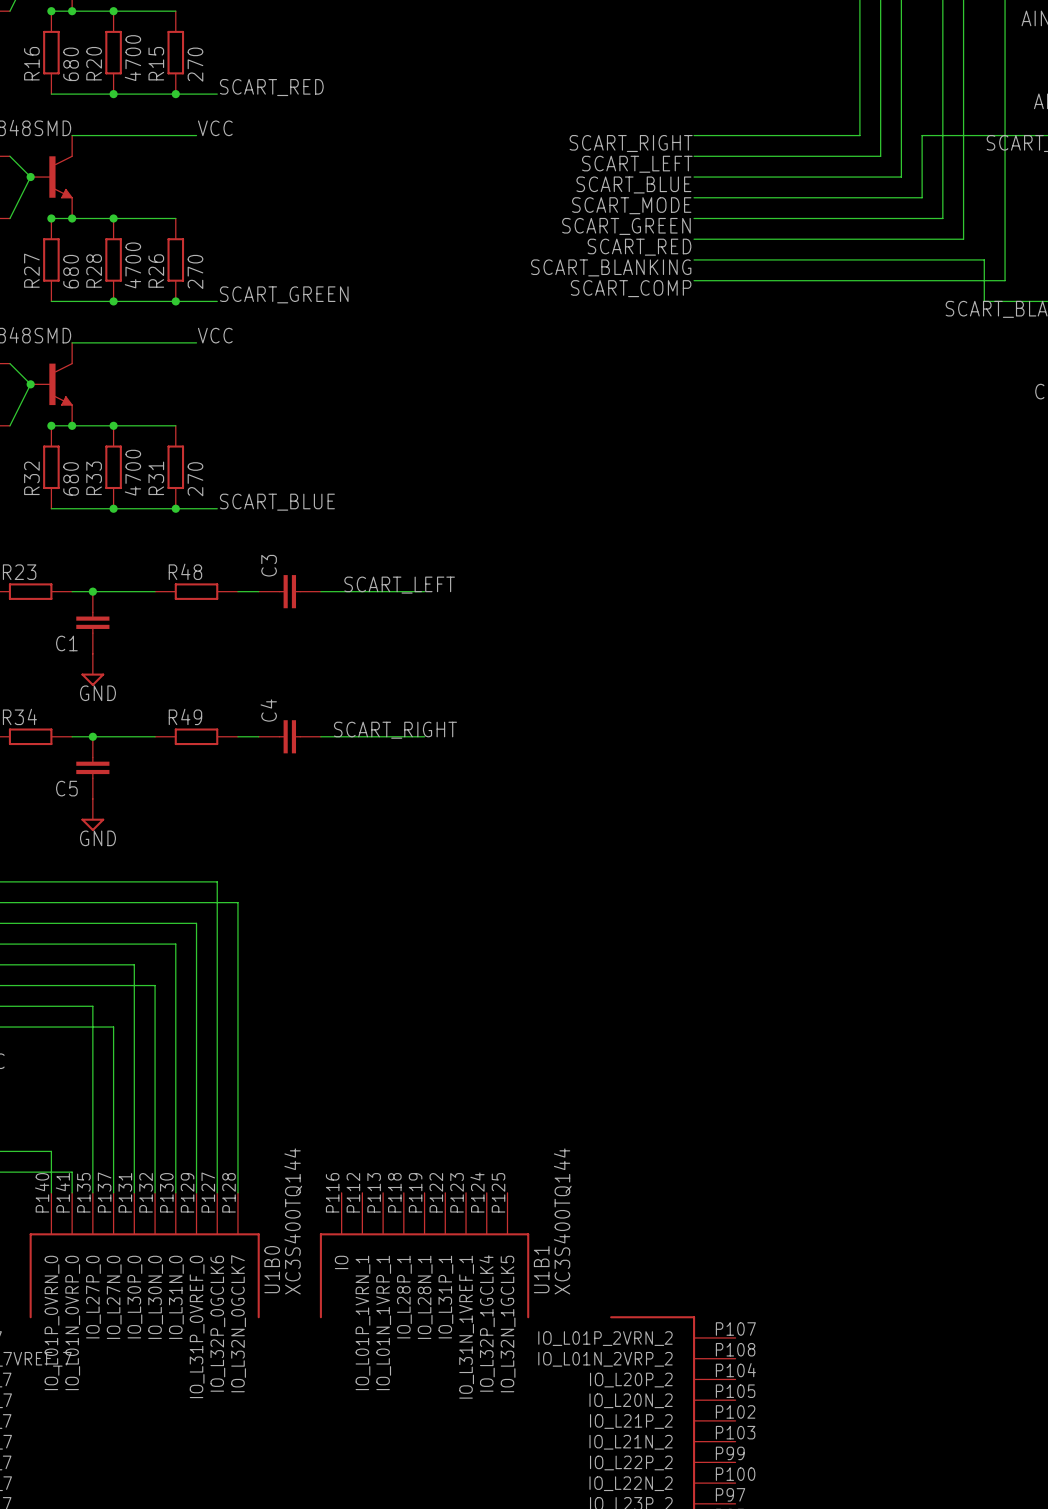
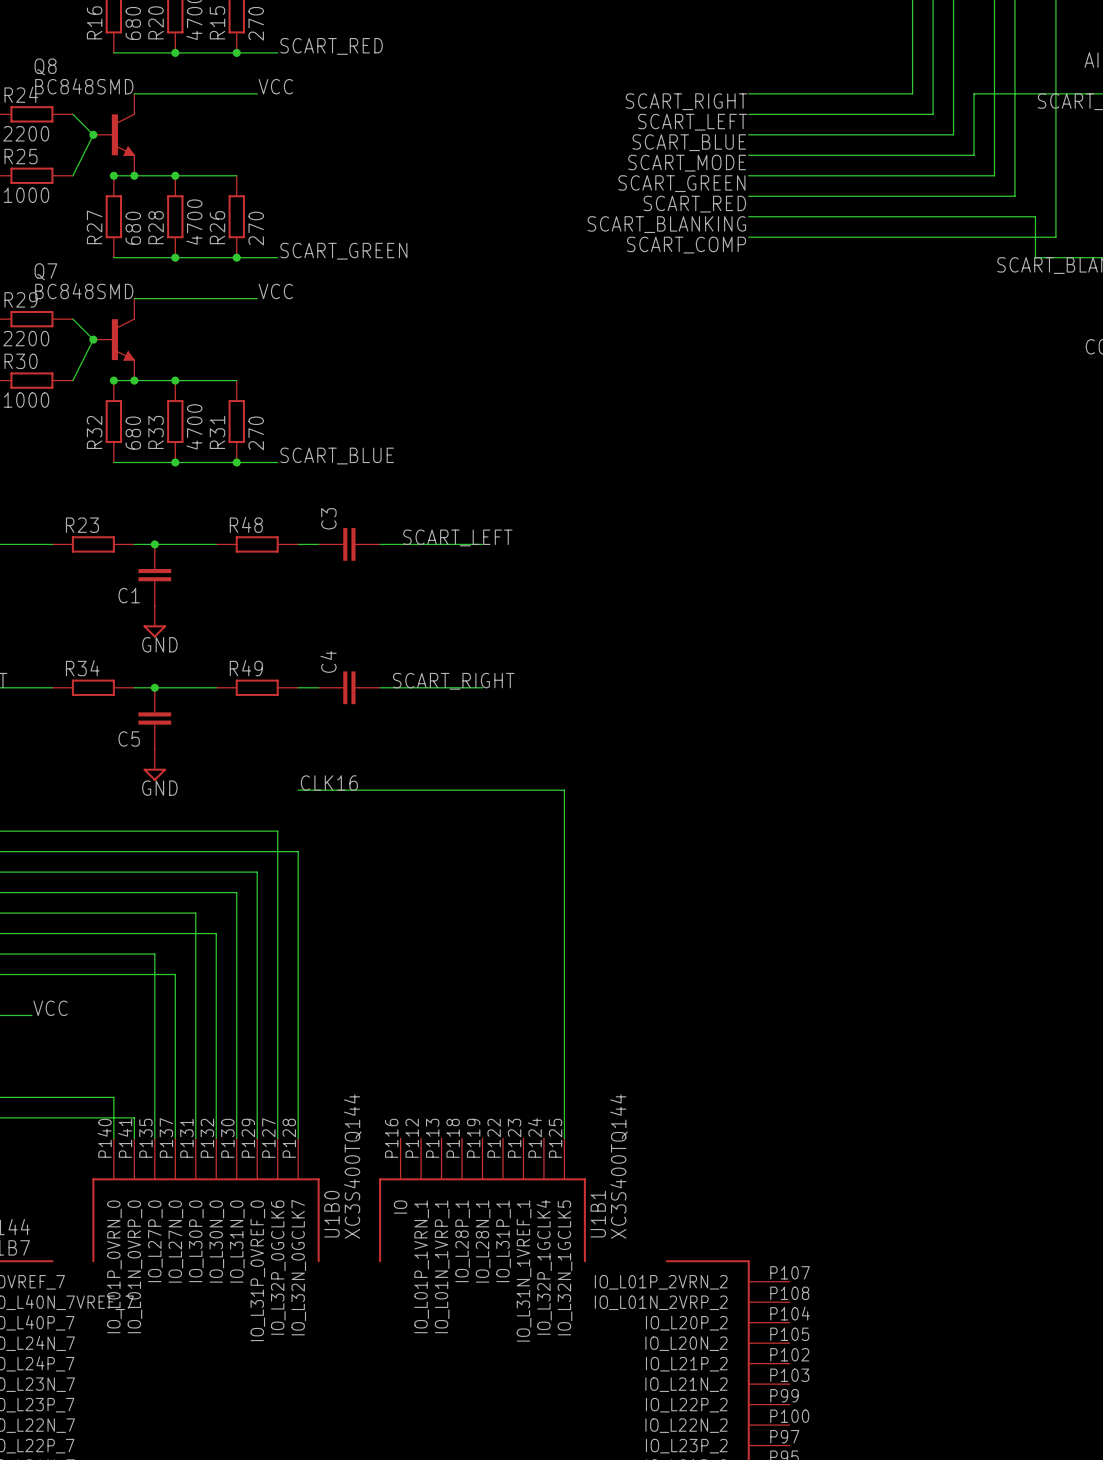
label: none -> CLK16 (329, 783)
wire: none -> (298, 790) (564, 790) (564, 1138)

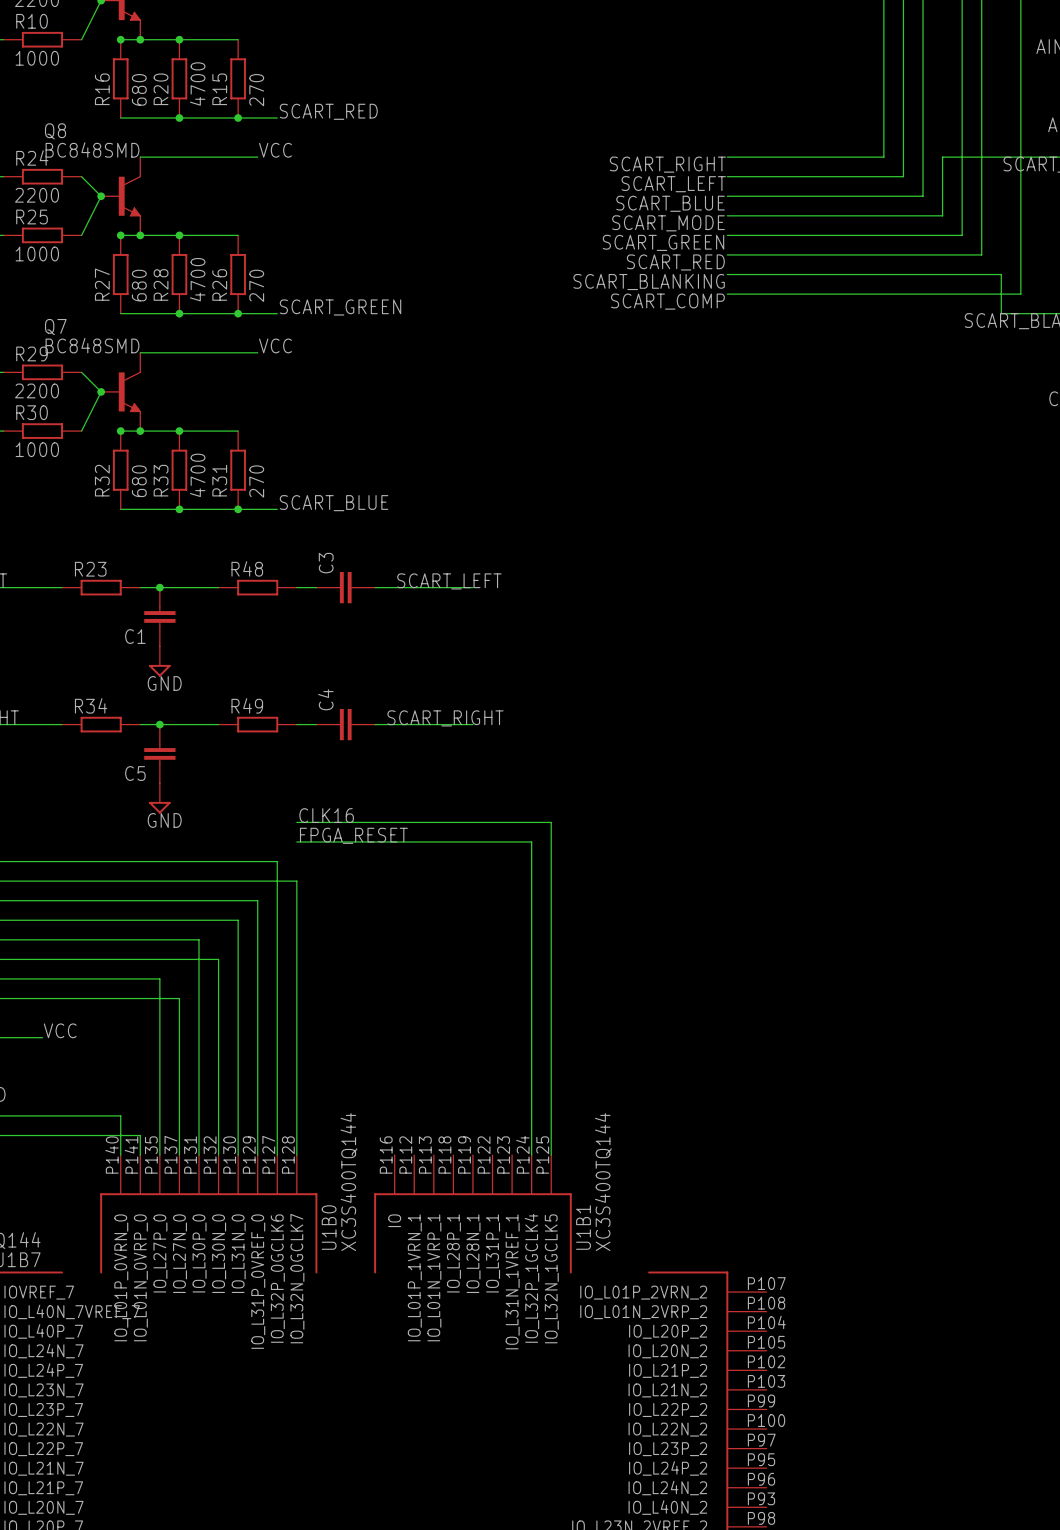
label: none -> FPGA_RESET (353, 835)
wire: none -> (296, 841) (531, 841) (531, 1155)

